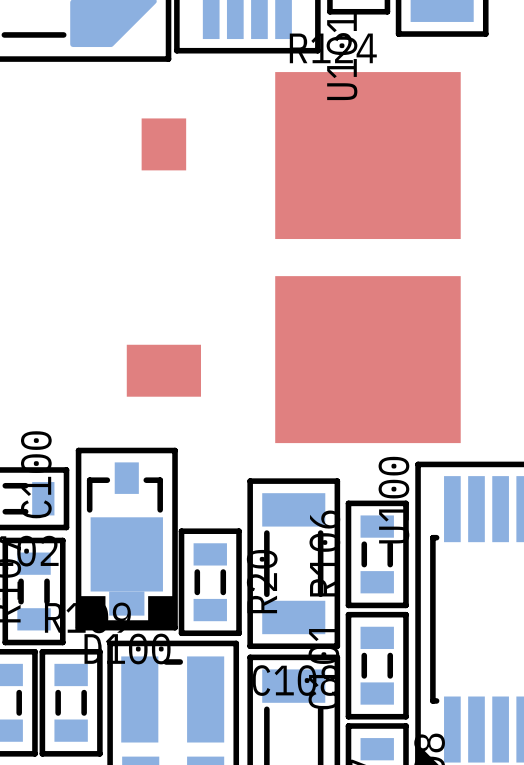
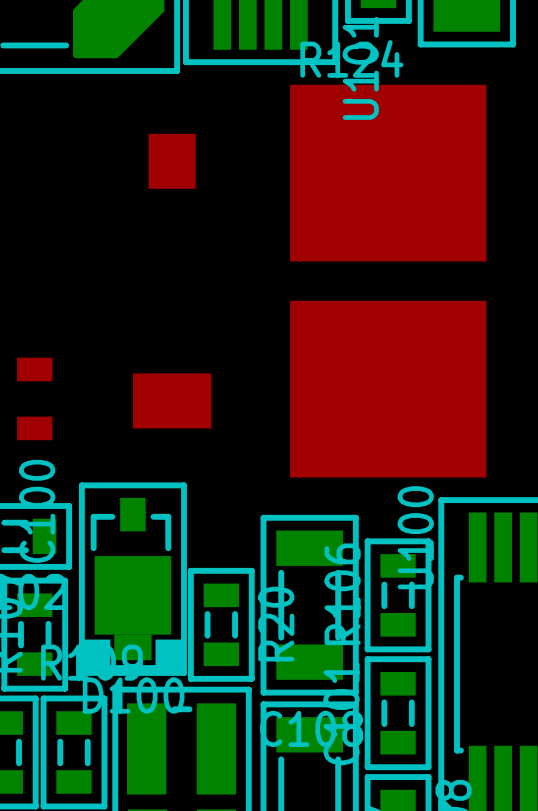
part: none -> (34, 398)

